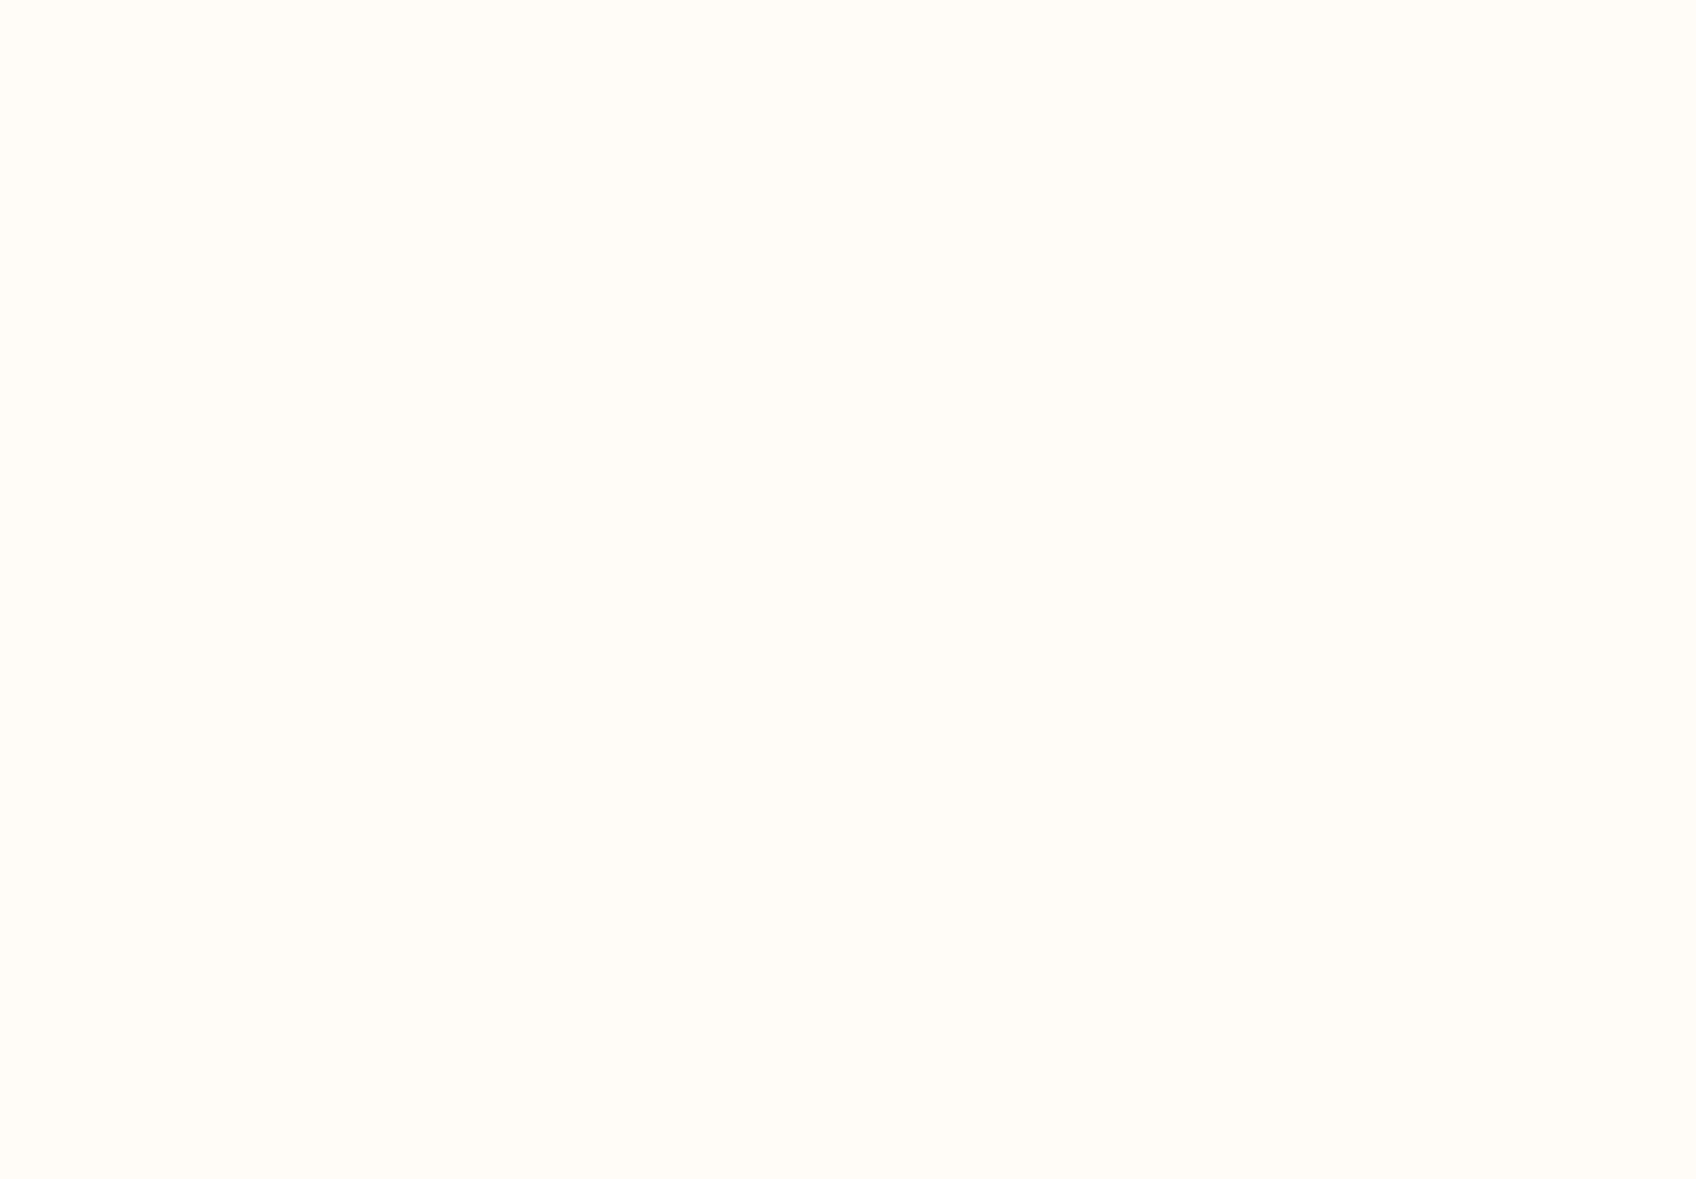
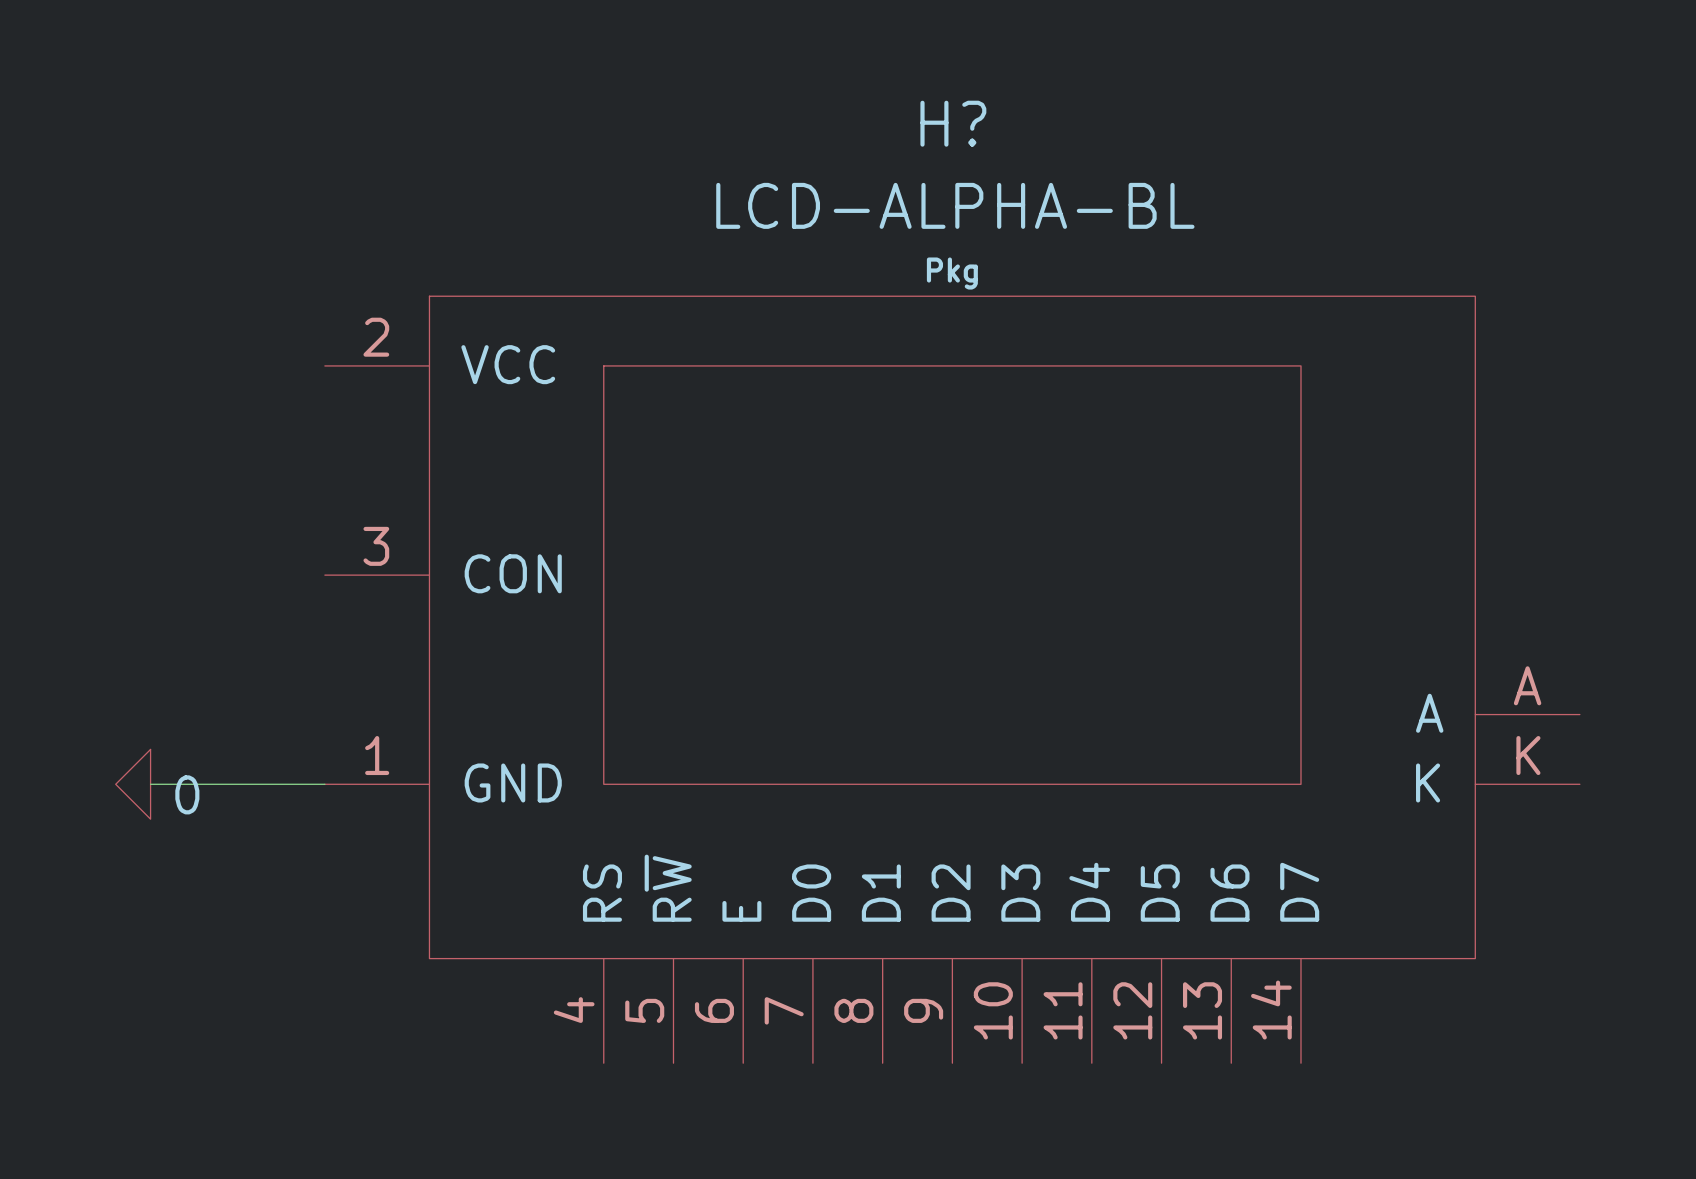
H?: none -> LCD-ALPHA-BL (952, 679)
power symbol: none -> 0 (133, 784)
wire: none -> (150, 784) (324, 784)

